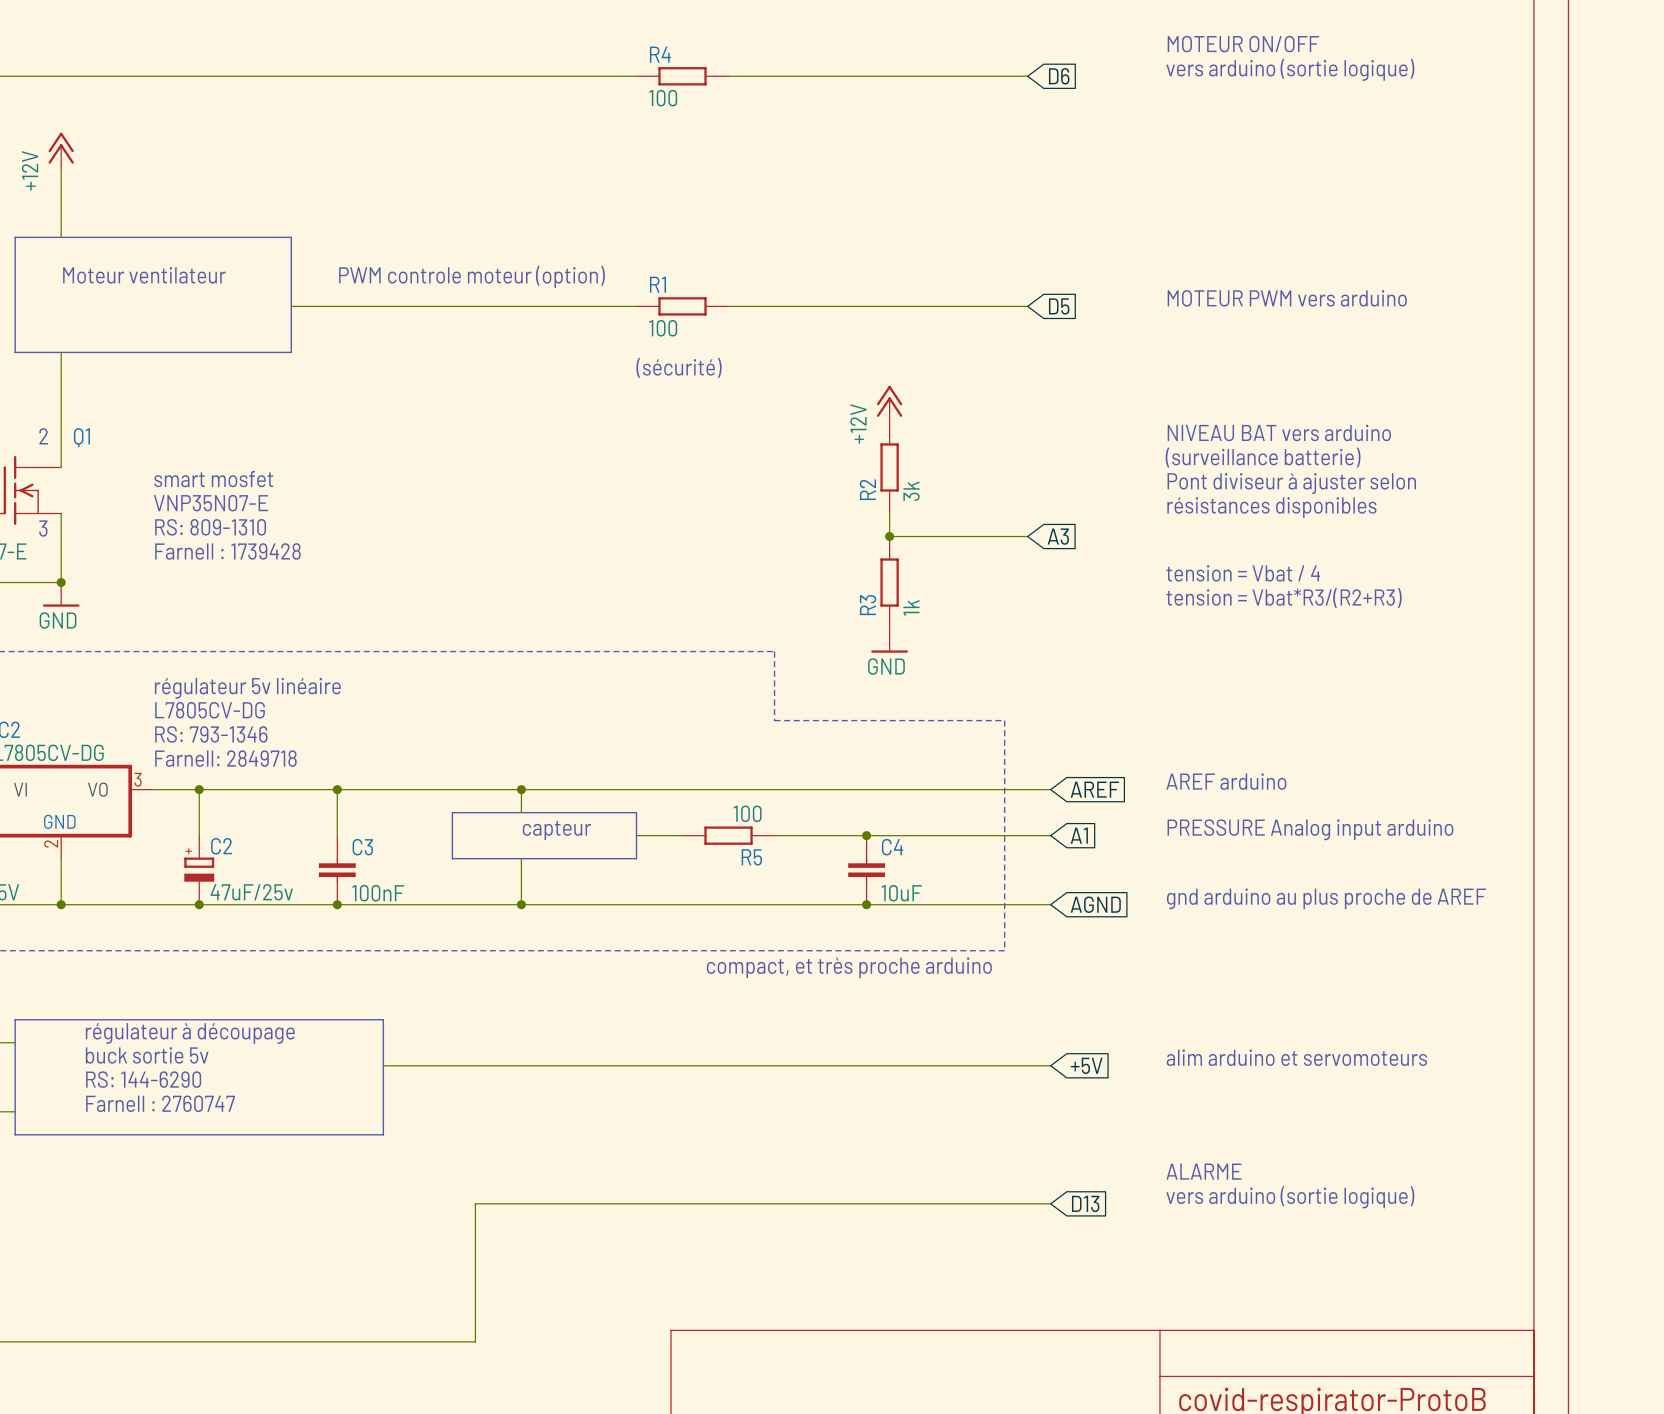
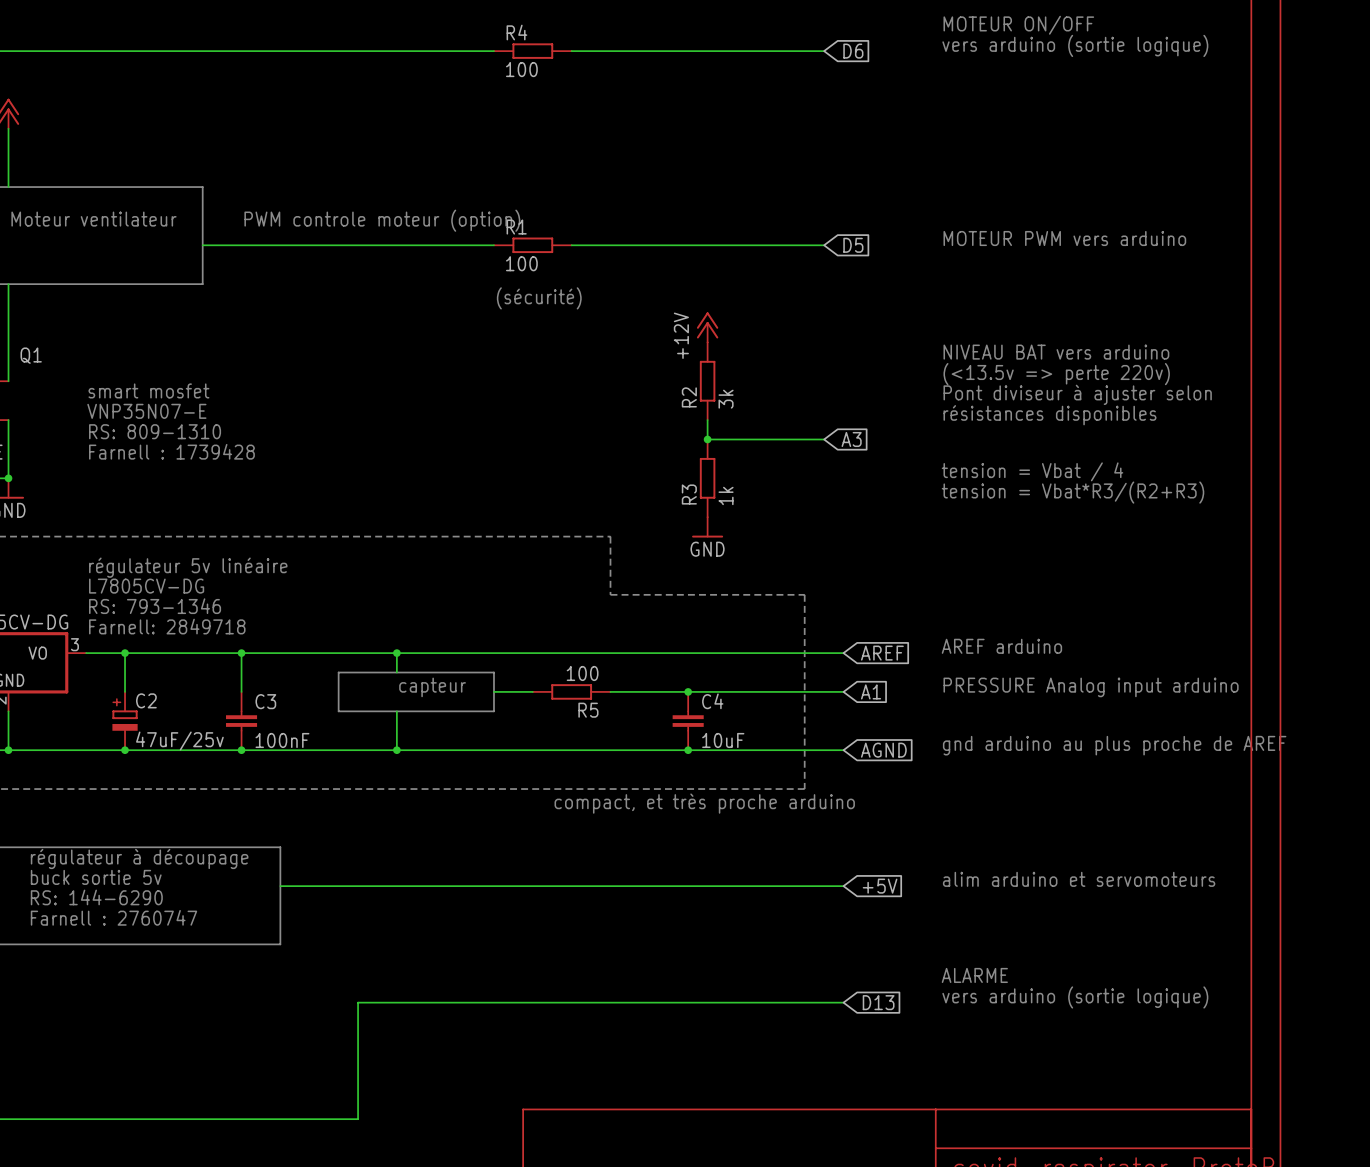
text: (surveillance batterie) (1263, 457) -> (<13.5v => perte 220v) (1056, 374)

